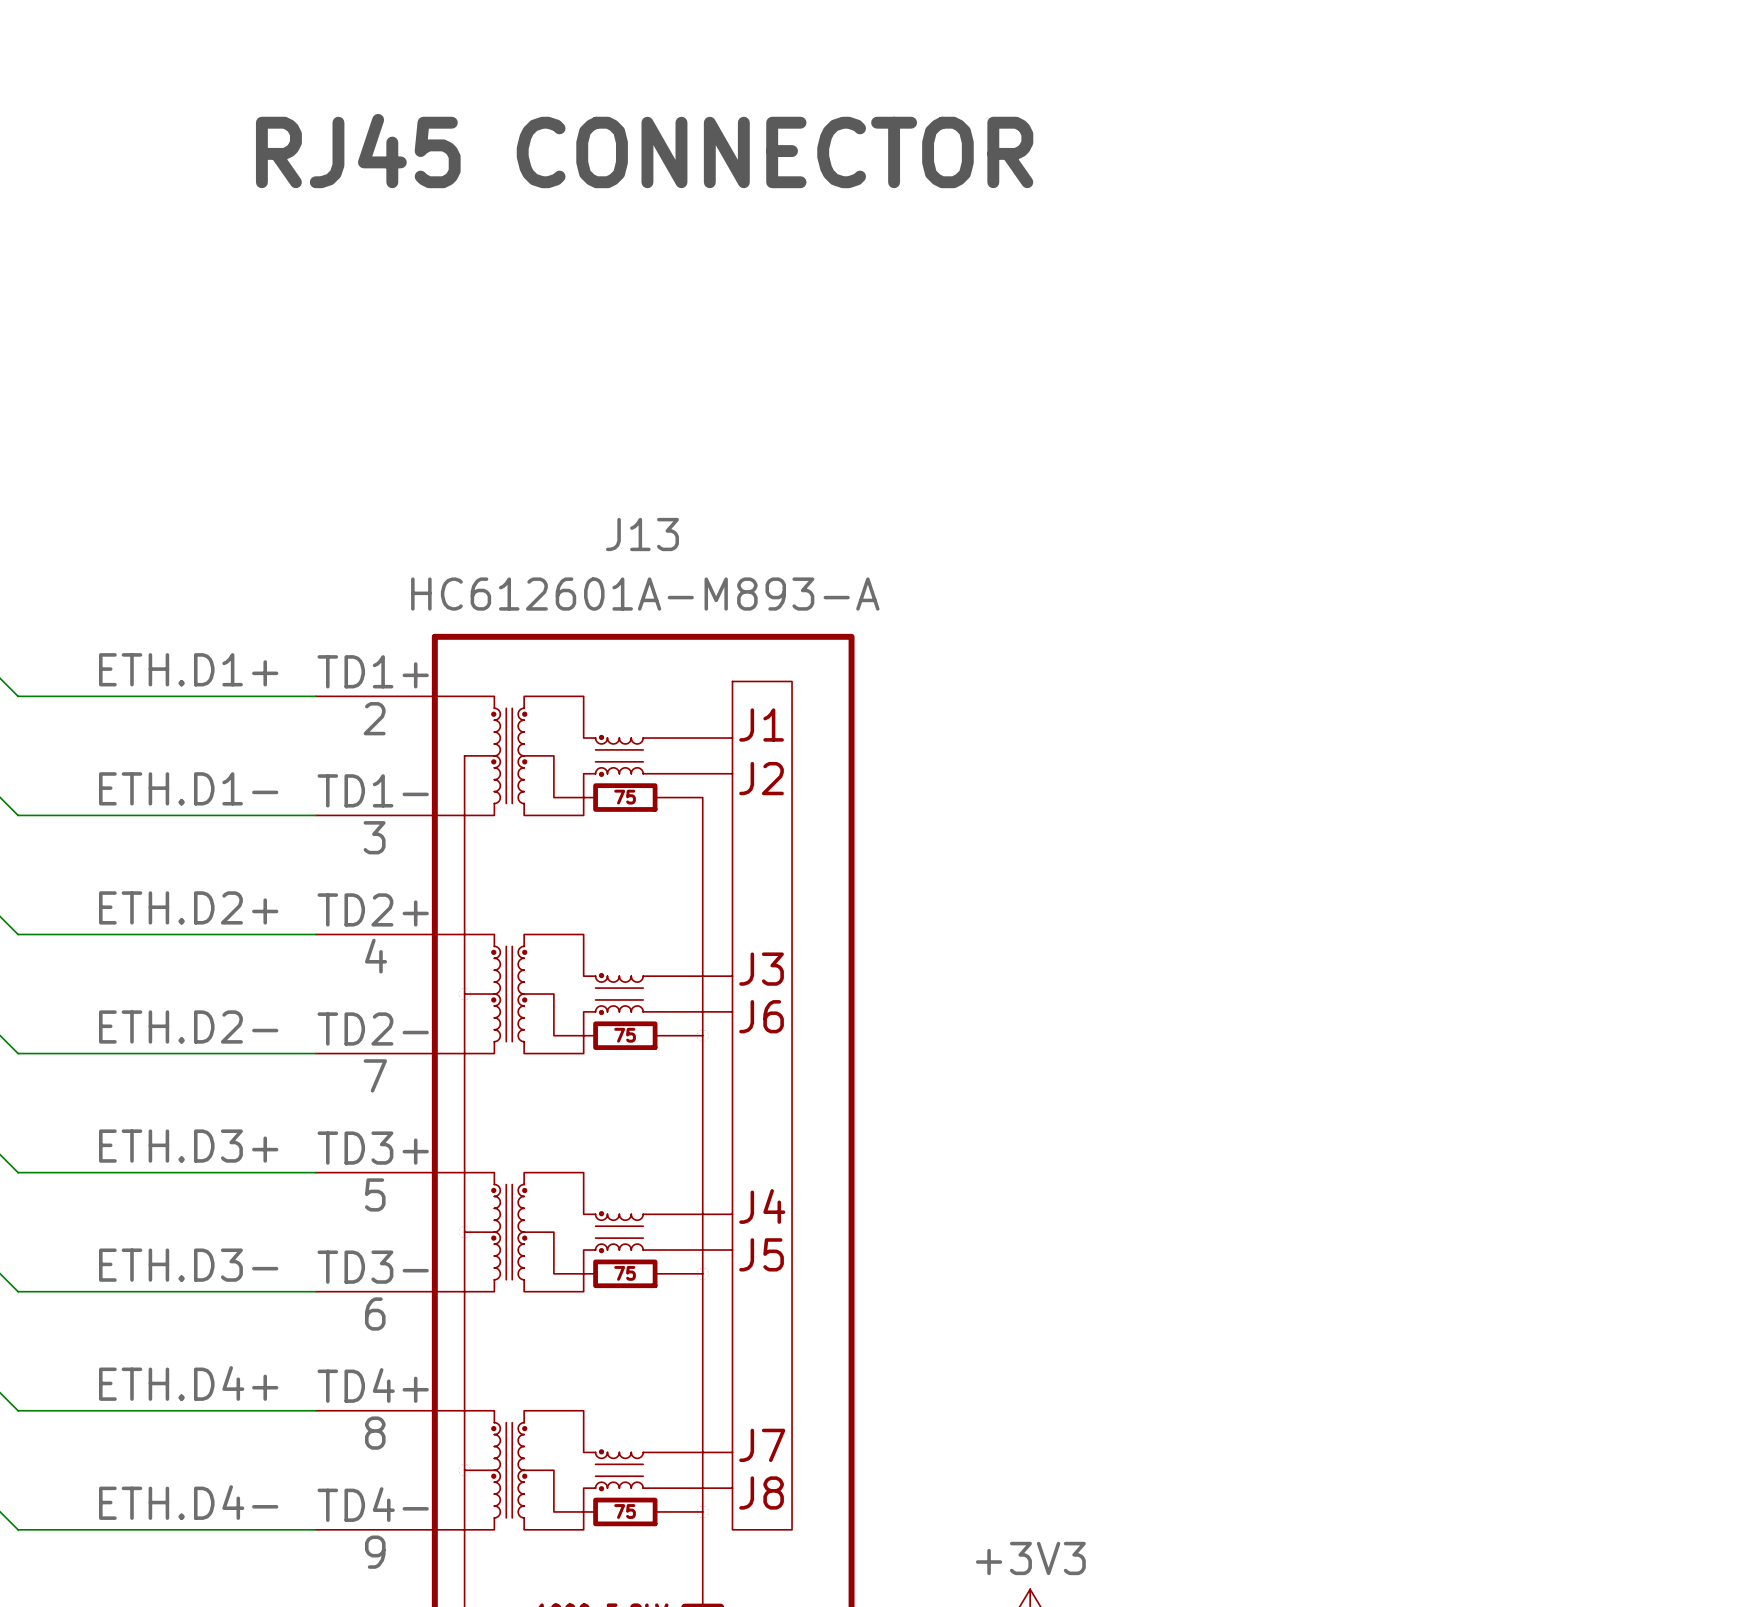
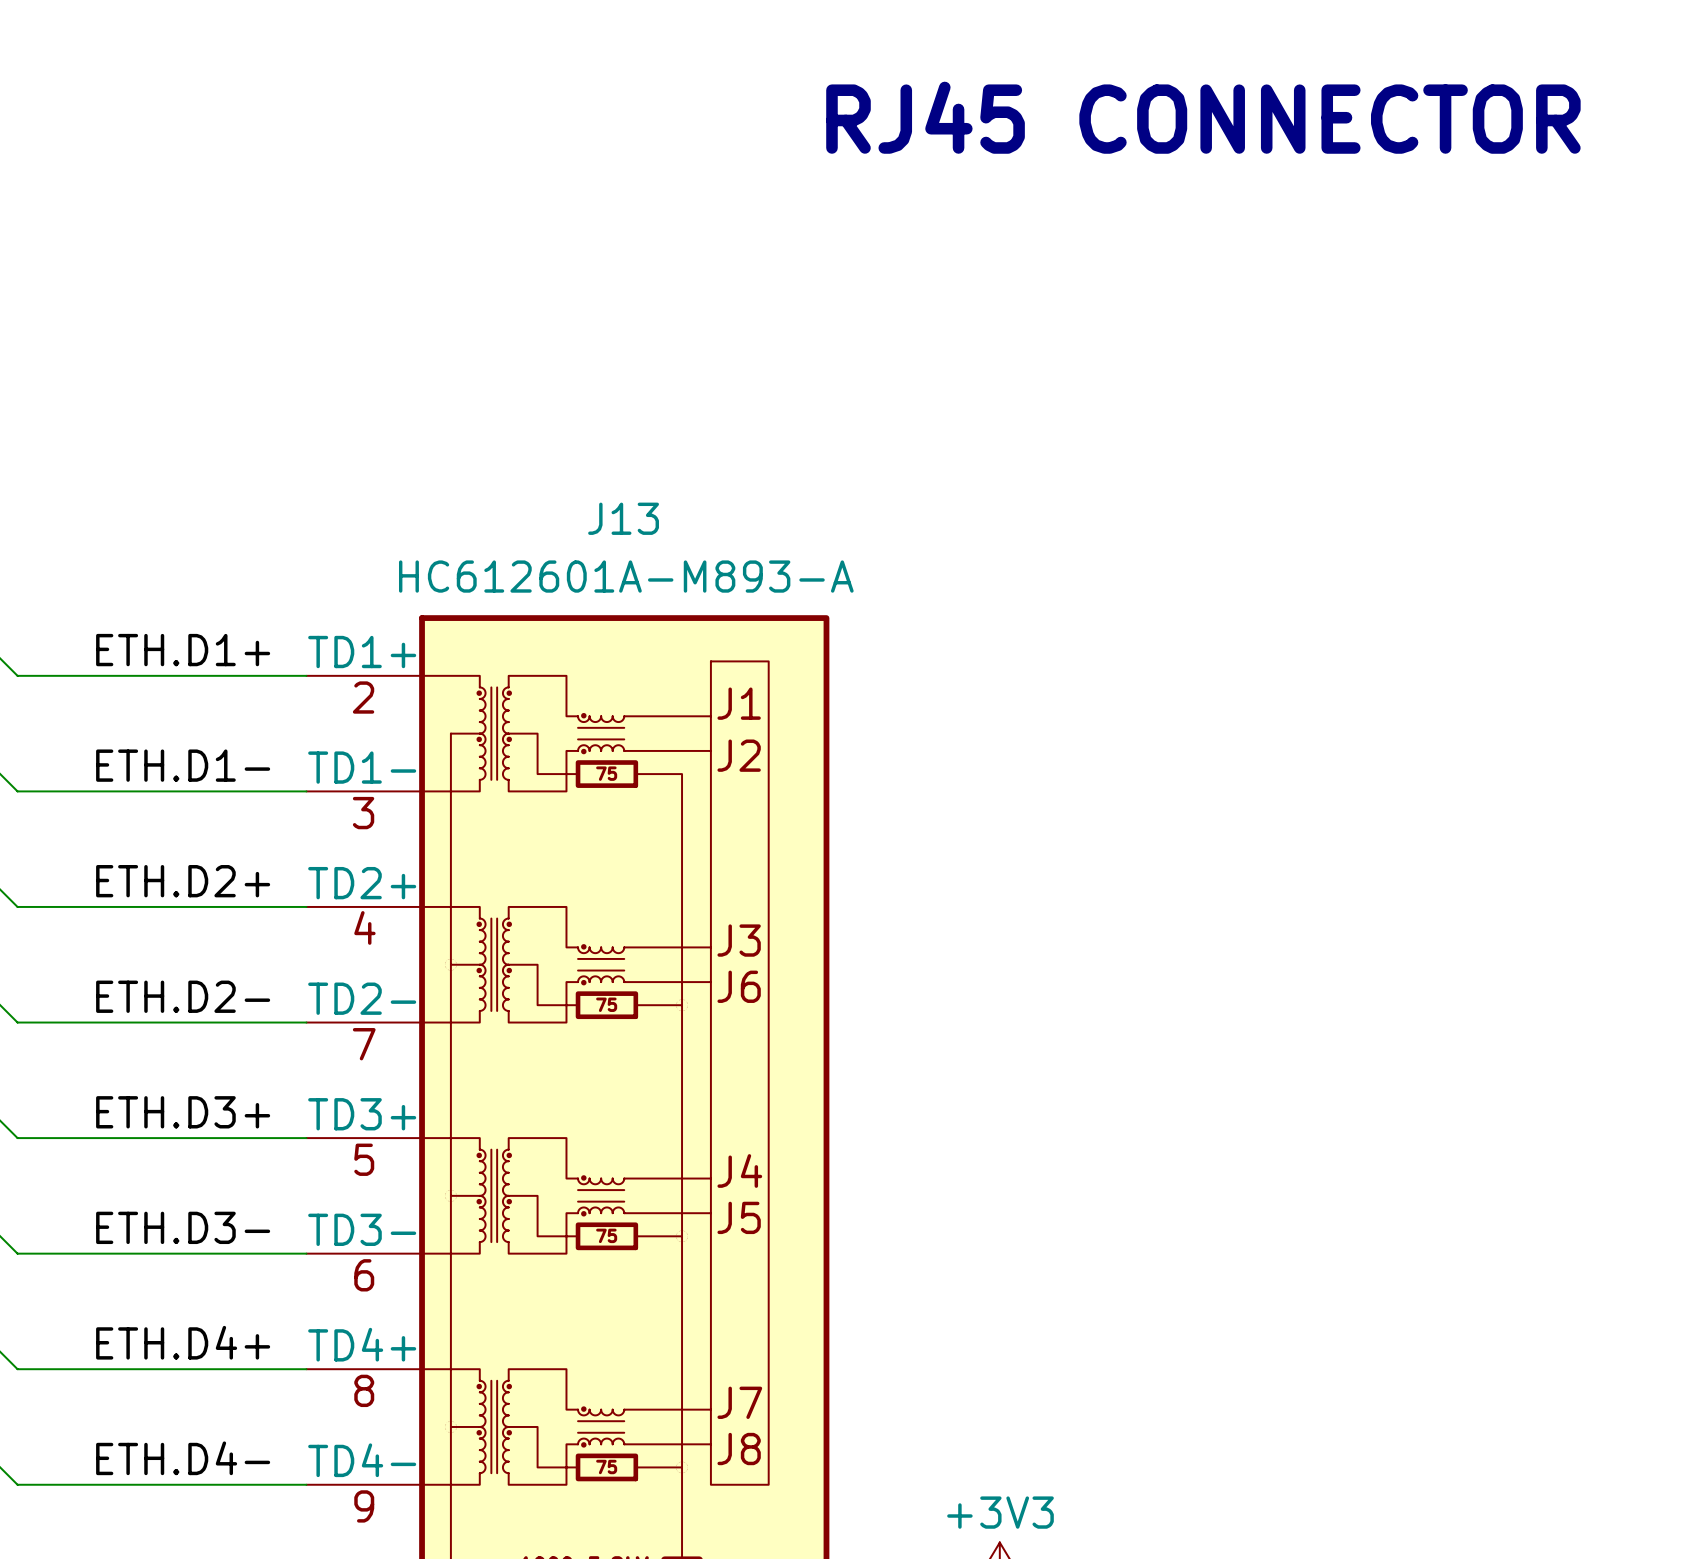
text: none -> RJ45 CONNECTOR (1203, 117)
text: RJ45 CONNECTOR (644, 151) -> none

